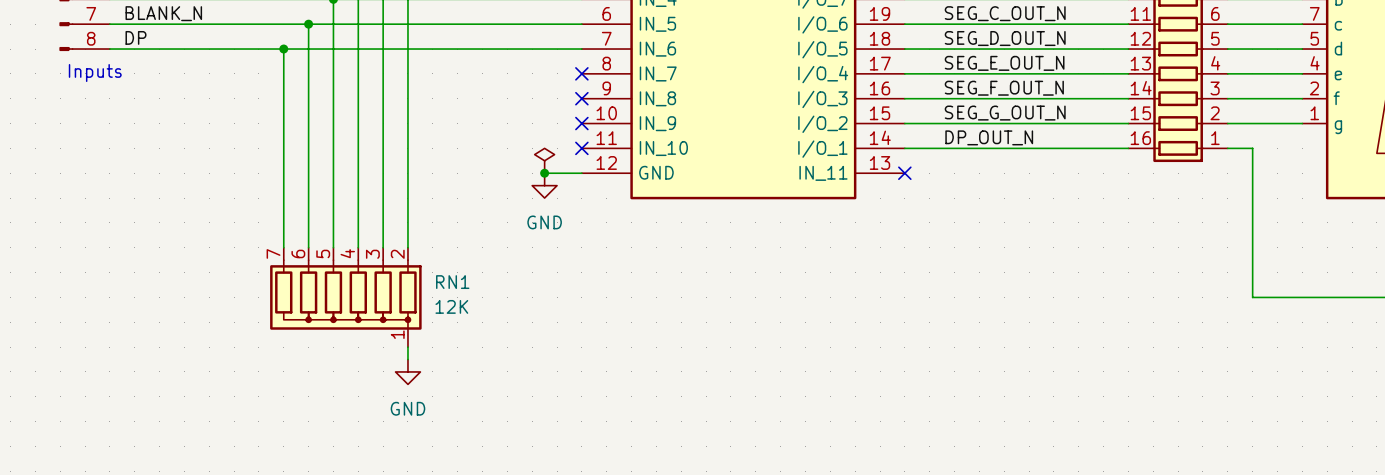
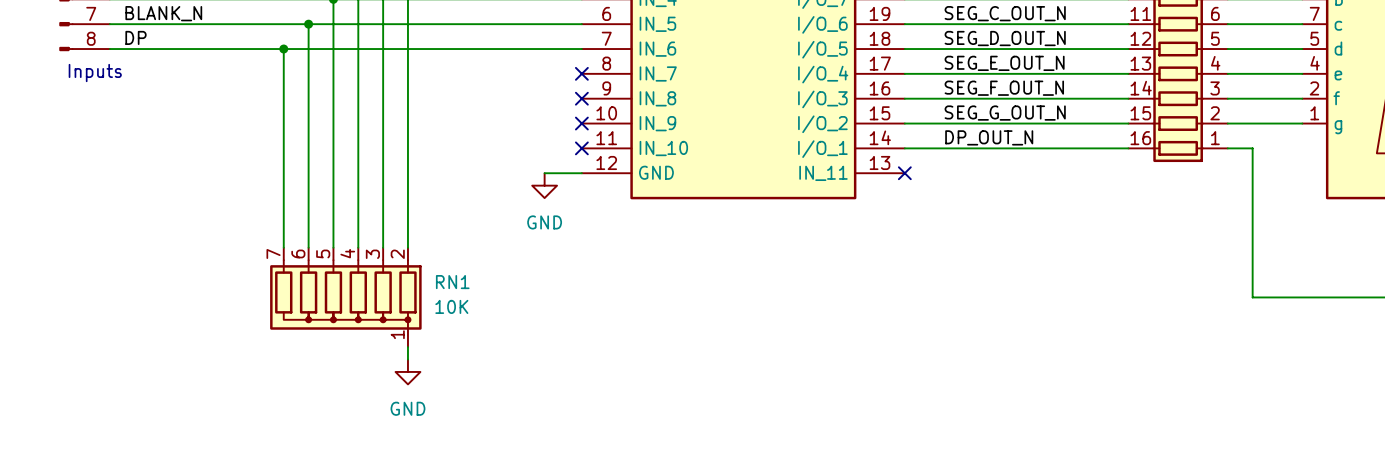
power symbol: (544, 160) -> none
junction: (544, 173) -> none
RN1 value: 12K (451, 306) -> 10K (451, 306)

